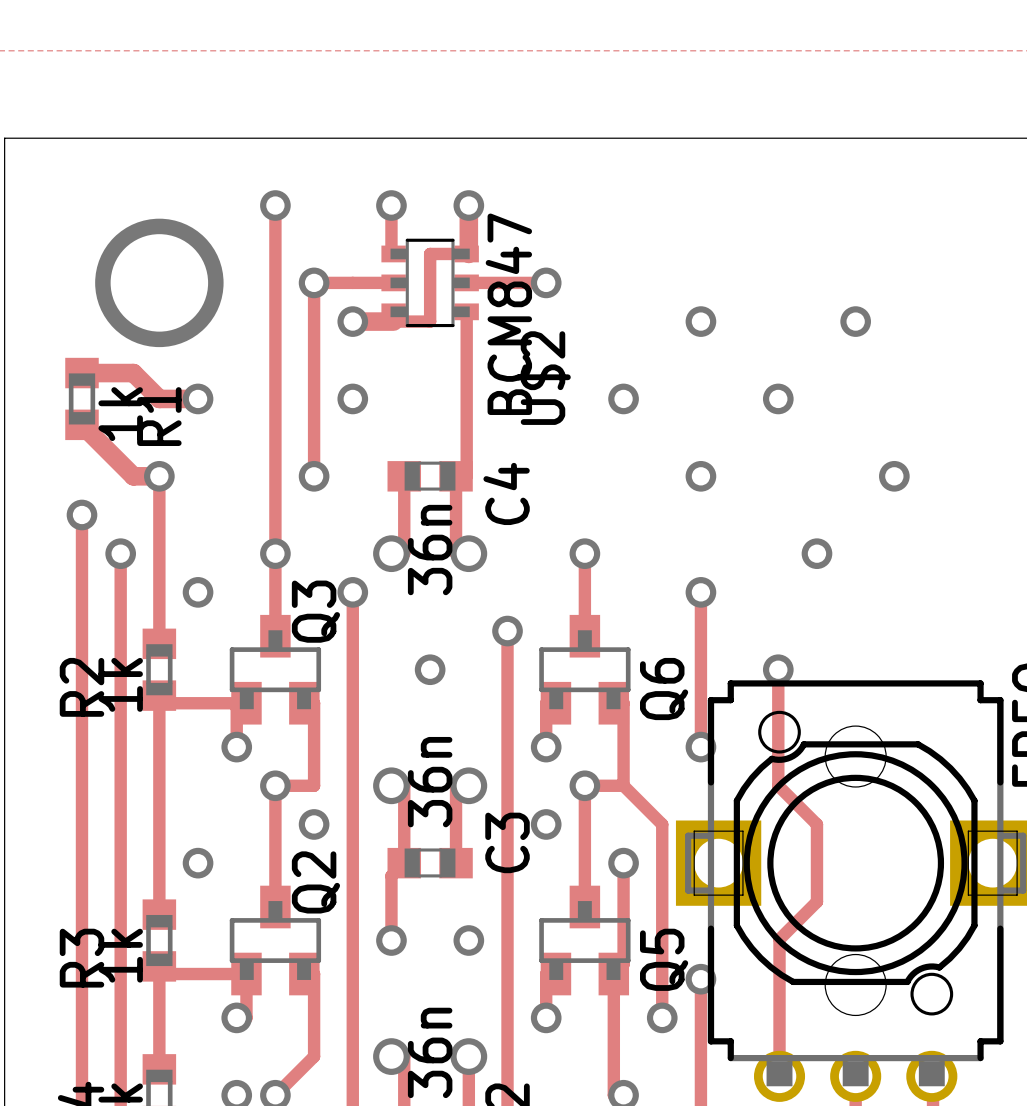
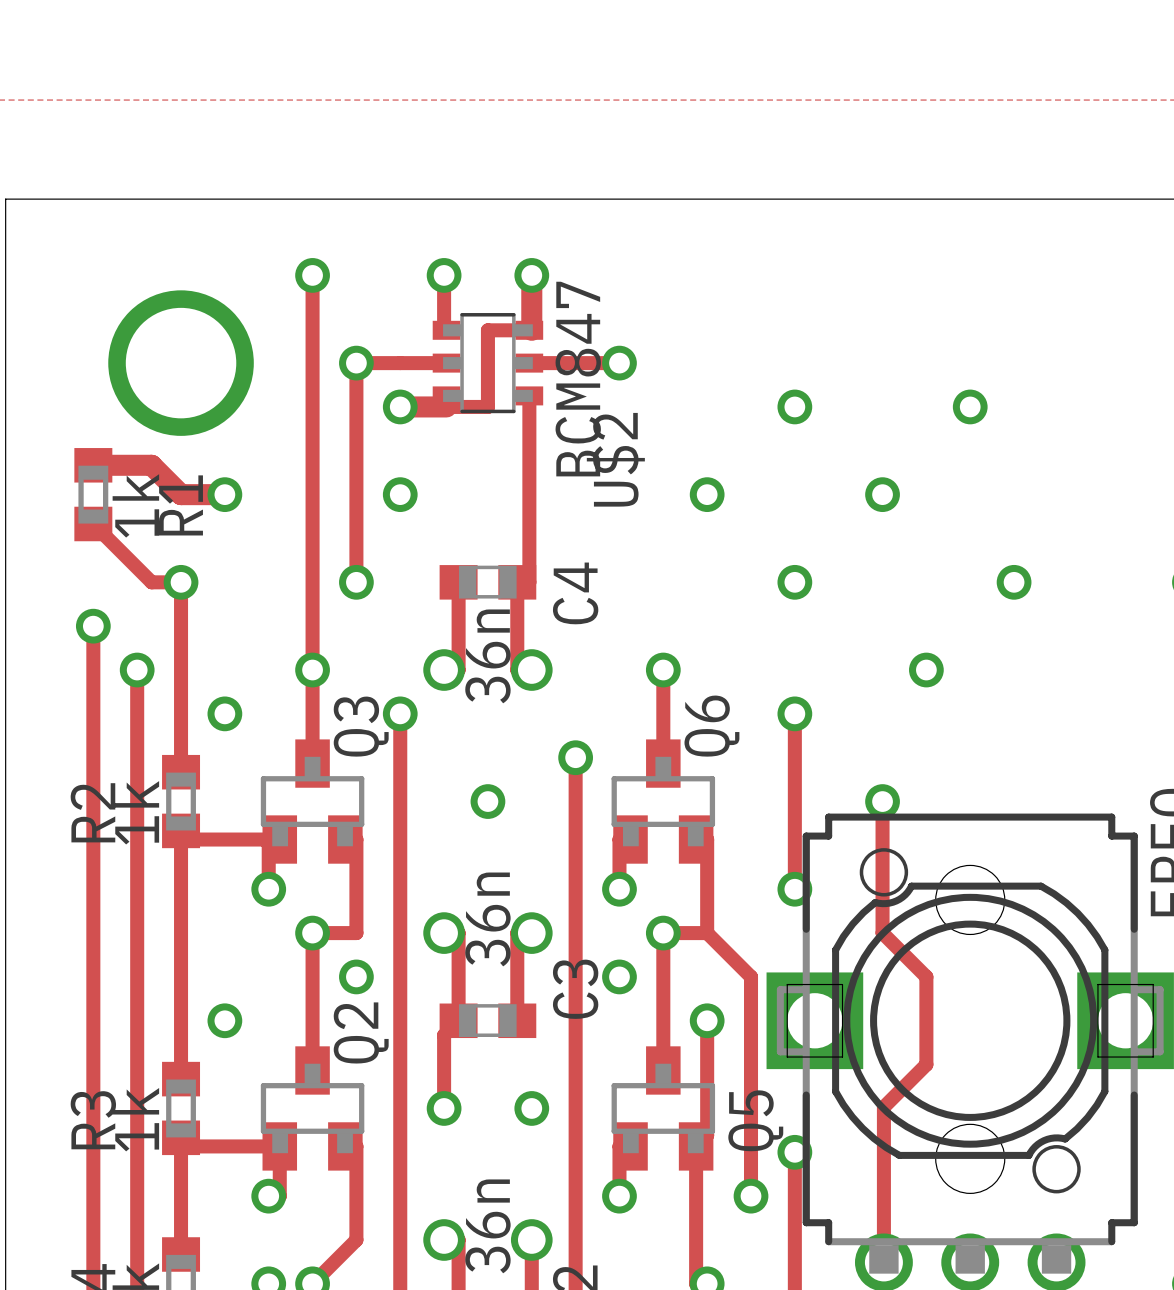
track width: thick (81, 424) (133, 476) (159, 476) -> thin (93, 523) (151, 582) (181, 582)
Q6 name position: Q6 (664, 689) -> Q6 (711, 726)

